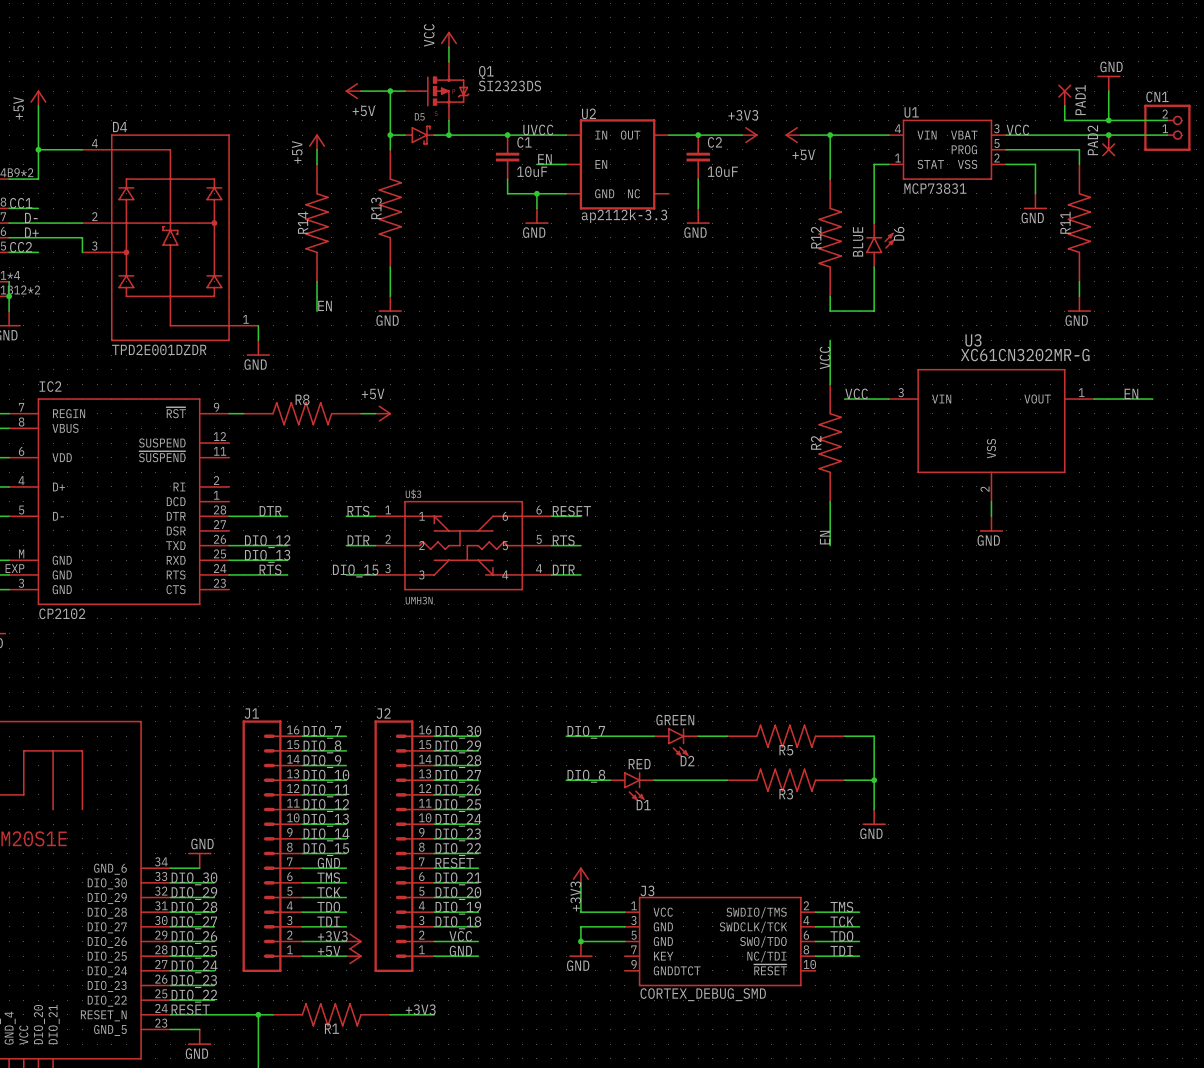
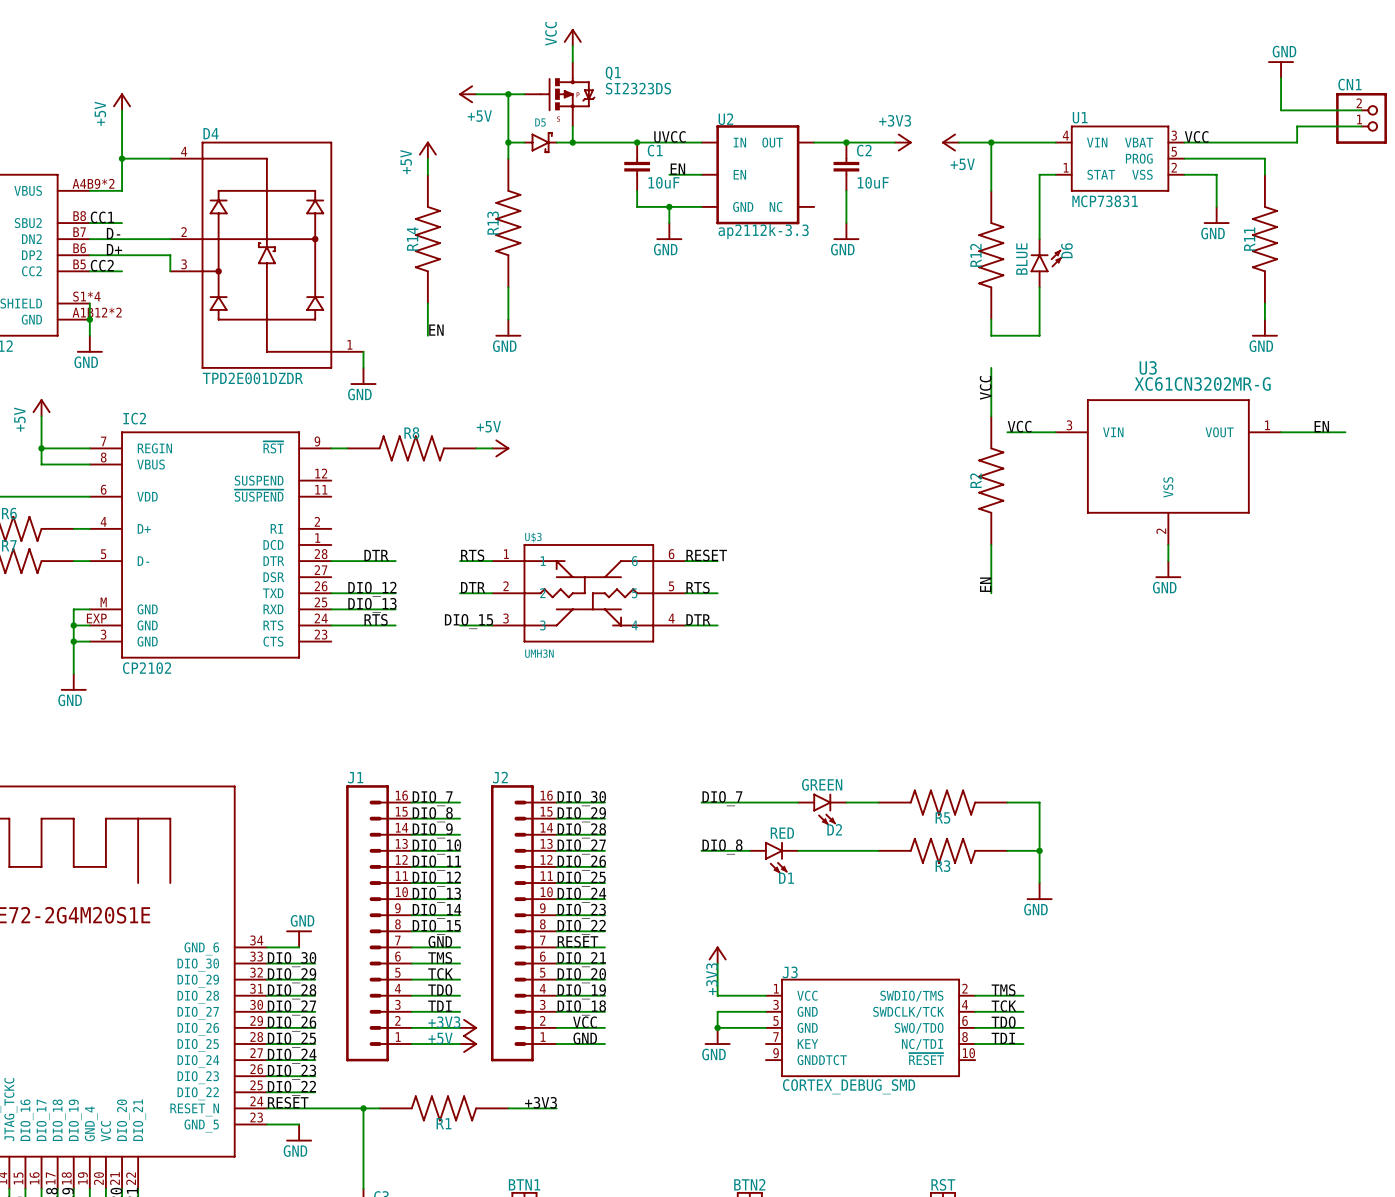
wire: none -> (1281, 78) (1281, 110) (1361, 110)
power symbol position: GND (1108, 83) -> GND (1281, 69)
wire: (1108, 91) (1108, 120) (1064, 120) (1064, 105) -> none
PAD1: (1064, 95) -> none
junction: (1108, 120) -> none
CN1 position: (1167, 127) -> (1361, 118)
wire: (1108, 135) (1167, 135) -> (1297, 142) (1297, 126)
junction: (1108, 135) -> none
PAD2: (1108, 145) -> none

